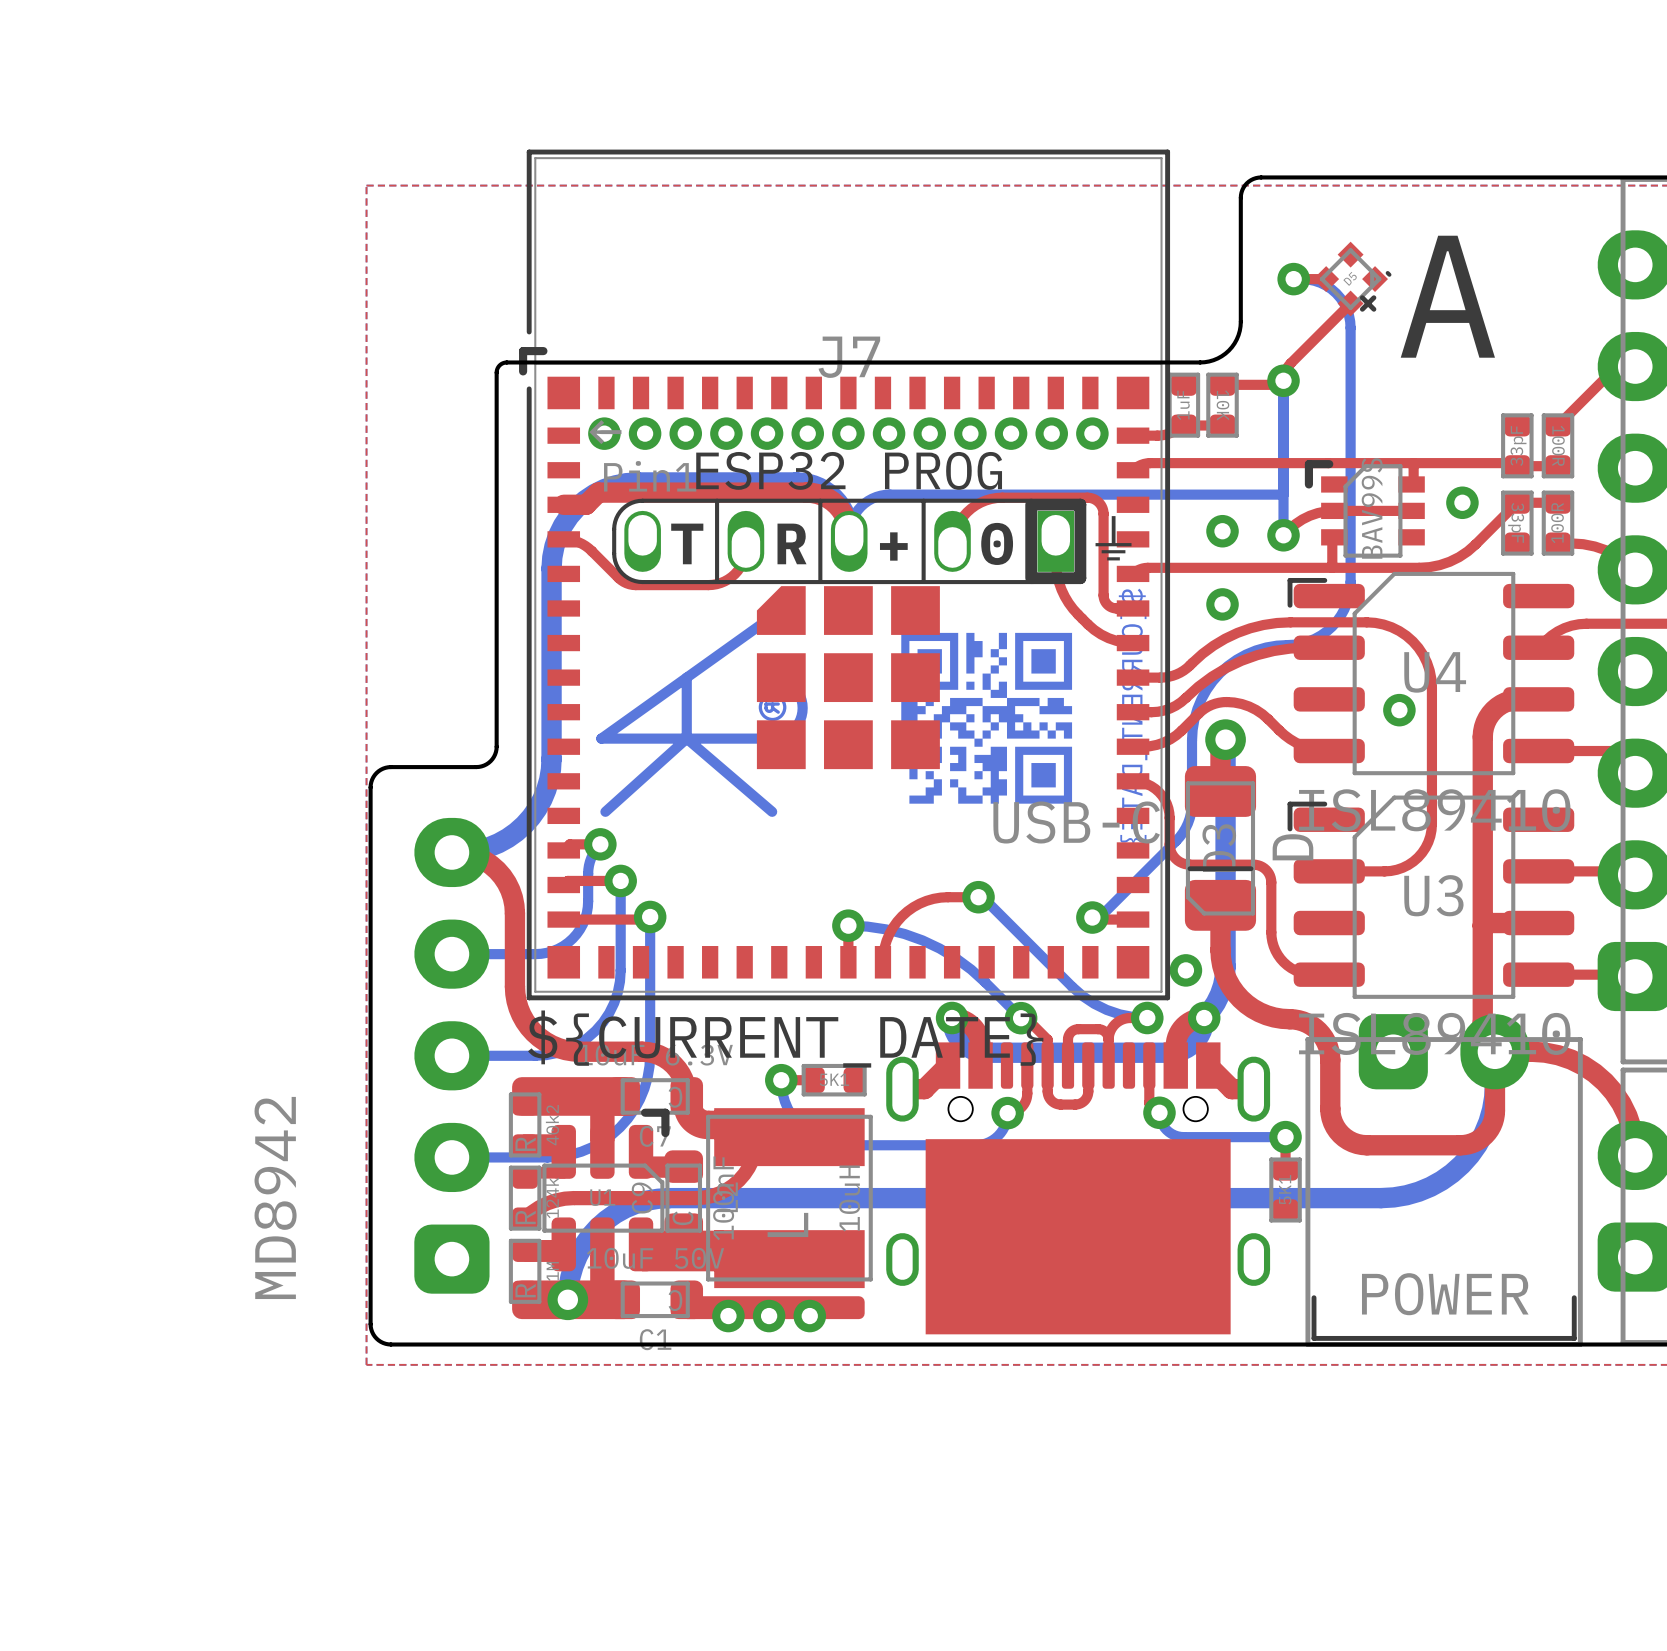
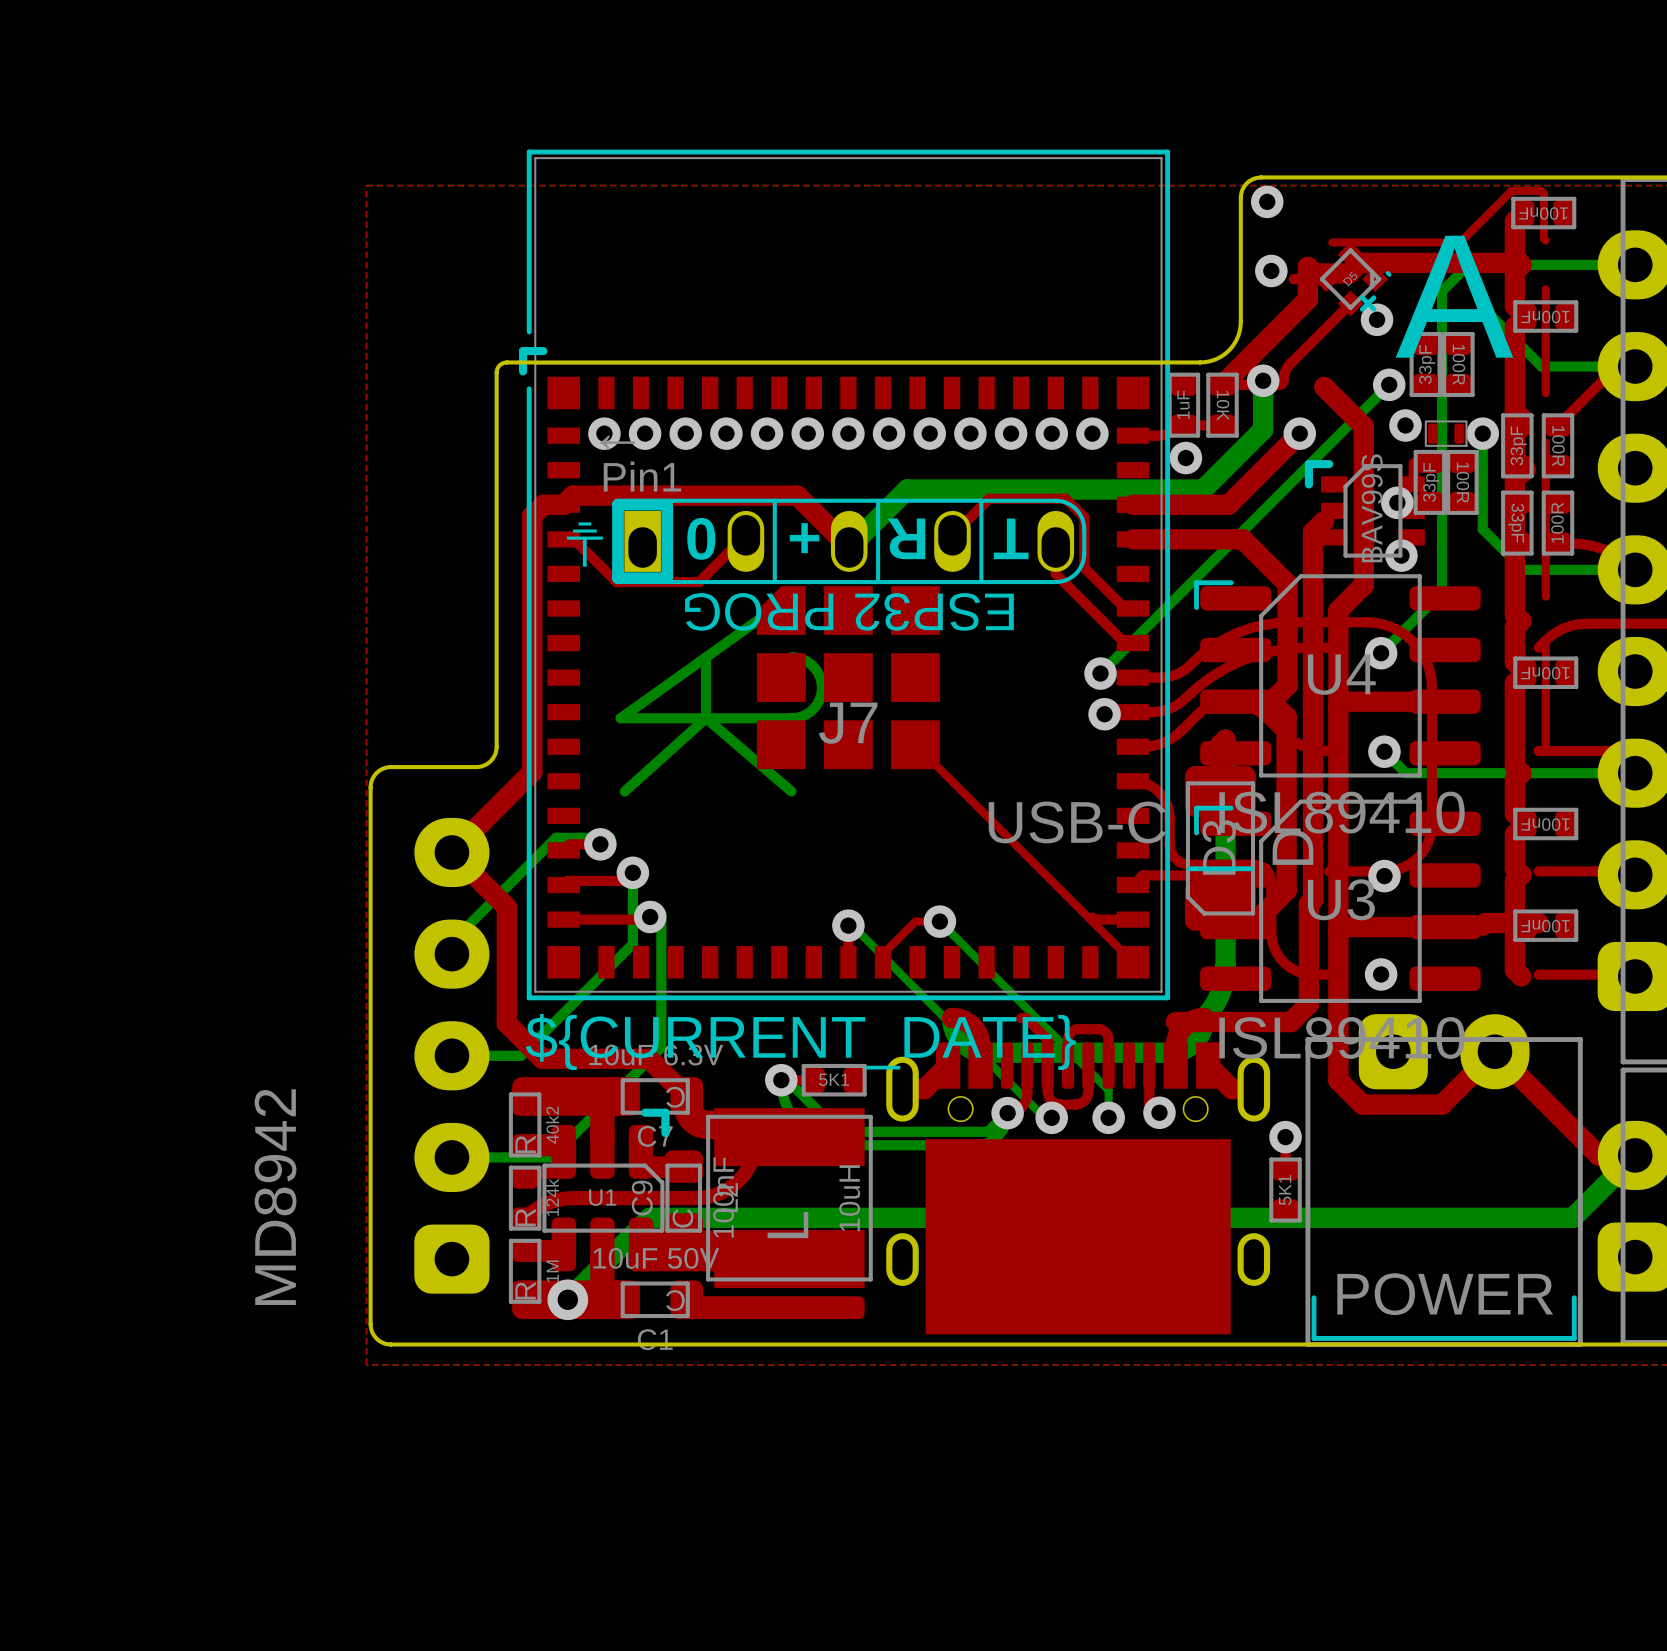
via: none -> (1267, 201)
top track: none -> (1523, 213) (1514, 221) (1514, 258) (1521, 264) (1514, 271) (1514, 305) (1525, 316) (1514, 327) (1514, 411) (1521, 417) (1514, 424) (1514, 458) (1525, 469) (1514, 480) (1514, 614) (1521, 621) (1514, 627) (1514, 662) (1525, 672) (1514, 683) (1514, 766) (1521, 773) (1514, 779) (1514, 813) (1525, 824) (1514, 834) (1514, 868) (1521, 874) (1514, 881) (1514, 915) (1525, 925) (1514, 936) (1514, 970) (1521, 976)
part: none -> 100nF (1543, 213)
top track: none -> (1545, 240) (1543, 238) (1543, 193) (1540, 190) (1511, 190) (1460, 242) (1332, 242)
top track: none -> (1519, 262) (1359, 262) (1349, 273) (1314, 273) (1307, 266) (1307, 299) (1222, 384)
bottom track: none -> (1635, 264) (1468, 264) (1442, 291) (1442, 592) (1381, 653)
bottom track: (1293, 279) (1314, 280) (1331, 289) (1344, 303) (1350, 321) (1350, 582) (1347, 602) (1336, 621) (1321, 635) (1301, 643) (1266, 647) (1246, 654) (1227, 665) (1212, 681) (1201, 699) (1194, 719) (1192, 740) (1191, 808) (1185, 828) (1176, 840) (1099, 917) (1092, 917) -> none
via position: (1293, 279) -> (1271, 270)
top track: none -> (1545, 289) (1545, 393)
bottom track: none -> (1482, 307) (1541, 366) (1635, 366)
part: none -> 100nF (1545, 316)
via: none -> (1377, 319)
part: none -> 33pF (1425, 364)
part: none -> 100R (1458, 364)
bottom track: none -> (1263, 380) (1263, 429) (1203, 489) (907, 489) (849, 547)
bottom track: (1283, 380) (1283, 535) -> none
via position: (1283, 380) -> (1263, 380)
bottom track: none -> (1389, 384) (1100, 673)
via: none -> (1389, 384)
via: none -> (1405, 425)
top track: none -> (1299, 433) (1228, 504) (1133, 504)
via: none -> (1299, 433)
part: none -> (1446, 433)
bottom track: none -> (1482, 433) (1482, 529) (1523, 569) (1635, 569)
via: none -> (1482, 433)
top track: none -> (1545, 442) (1545, 596)
via: none -> (1185, 458)
top track: (1557, 466) (1517, 466) (1514, 463) (1150, 463) (1140, 464) (1138, 466) (1135, 468) (1133, 470) (1140, 467) -> none
part: none -> 33pF (1429, 482)
part: none -> 100R (1462, 482)
bottom track: (1283, 494) (885, 494) (868, 500) (858, 509) (851, 521) (849, 535) (846, 517) (837, 502) (824, 490) (808, 483) (637, 482) (604, 488) (576, 507) (563, 525) (554, 546) (551, 568) (551, 758) (549, 779) (542, 799) (531, 817) (507, 838) (478, 850) (451, 852) -> none
via: none -> (1397, 502)
via: (1462, 502) -> none
top track: (1557, 502) (1517, 502) (1467, 551) (1449, 561) (1429, 567) (1147, 567) (1139, 569) (1133, 573) -> none
top track: (563, 504) (586, 504) (598, 492) (812, 492) (827, 498) (836, 505) (845, 518) (849, 535) -> none
top track: (1411, 510) (1326, 511) (1302, 519) (1283, 535) -> none
top track: none -> (1324, 521) (1312, 532) (1312, 900) (1308, 904) (1308, 1003) (1290, 1022) (1175, 1022)
via: (1222, 531) -> none
via: (1283, 535) -> none
top track: (1334, 537) (1332, 541) (1332, 567) -> none
top track: (563, 539) (575, 541) (585, 545) (621, 580) (635, 585) (708, 585) (720, 583) (737, 570) (743, 559) (745, 547) -> (563, 539) (573, 539) (616, 582) (699, 582) (745, 535)
top track: none -> (1133, 539) (1242, 539) (1287, 584) (1287, 685) (1271, 701)
J7 rotation: 0° (849, 541) -> 180° (849, 541)
top track: (952, 547) (953, 536) (960, 520) (971, 508) (985, 500) (1002, 497) (1092, 498) (1100, 503) (1103, 512) (1104, 599) (1111, 607) (1124, 608) -> (952, 535) (989, 498) (1065, 498) (1084, 517) (1084, 567) (1124, 608)
via: none -> (1401, 555)
top track: (1055, 560) (1061, 589) (1078, 614) (1101, 634) (1116, 640) (1133, 643) -> (1055, 560) (1055, 573) (1124, 643) (1133, 643)
via: (1222, 604) -> none
top track: none -> (1545, 645) (1545, 748)
via: none -> (1381, 653)
part: none -> 100nF (1545, 672)
via: none -> (1100, 673)
U4 position: (1430, 673) -> (1337, 675)
top track: (1538, 699) (1515, 699) (1501, 704) (1490, 714) (1483, 731) (1482, 1022) (1485, 1038) (1494, 1051) -> none
top track: none -> (1271, 701) (1286, 716) (1286, 890) (1250, 927) (1235, 927)
top track: none -> (1445, 701) (1344, 701) (1338, 708)
via: (1399, 710) -> none
drawing position: (702, 714) -> (721, 693)
via: none -> (1104, 714)
part: (986, 718) -> none
via: (1225, 739) -> none
top track: none -> (915, 744) (1133, 962)
bottom track: none -> (1384, 751) (1405, 773) (1635, 773)
via: none -> (1384, 751)
part: none -> 100nF (1545, 824)
bottom track: (600, 844) (593, 854) (588, 865) (587, 907) (585, 918) (576, 934) (568, 942) (558, 948) (541, 953) (451, 954) -> (610, 837) (556, 837) (451, 941) (451, 954)
top track: (451, 852) (469, 854) (484, 860) (497, 870) (510, 890) (514, 913) (515, 993) (521, 1014) (534, 1032) (545, 1041) (565, 1050) (642, 1051) (659, 1055) (669, 1060) (677, 1069) (683, 1079) (686, 1096) -> (849, 547) (797, 495) (572, 495) (563, 504) (543, 504) (532, 515) (532, 772) (451, 852) (506, 907) (506, 1023) (542, 1058) (649, 1058) (686, 1096)
top track: none -> (1235, 875) (1142, 875) (1133, 885)
via: none -> (1384, 876)
bottom track: (620, 880) (619, 981) (609, 1013) (595, 1030) (567, 1049) (546, 1055) (521, 1055) -> (632, 872) (632, 943) (521, 1055)
via position: (620, 880) -> (632, 872)
top track: (978, 897) (940, 897) (926, 900) (913, 907) (902, 916) (892, 927) (886, 940) (882, 962) -> (939, 921) (915, 921) (882, 954) (882, 962)
bottom track: (978, 897) (985, 900) (1082, 996) (1094, 1003) (1119, 1014) (1147, 1018) -> none
via position: (978, 897) -> (939, 921)
U3 position: (1430, 897) -> (1337, 901)
top track: (1220, 905) (1220, 957) (1227, 980) (1240, 998) (1252, 1008) (1274, 1017) (1303, 1021) (1314, 1028) (1321, 1034) (1327, 1046) (1330, 1055) (1331, 1118) (1337, 1130) (1348, 1140) (1366, 1145) (1460, 1145) (1478, 1139) (1489, 1129) (1494, 1118) (1494, 1051) -> none
bottom track: (650, 916) (650, 1054) (647, 1077) (640, 1099) (620, 1127) (602, 1141) (570, 1154) (547, 1157) -> (661, 913) (661, 1047) (551, 1157) (547, 1157)
via: (1092, 917) -> none
bottom track: none -> (848, 921) (1044, 1117) (1051, 1117)
bottom track: none -> (939, 921) (1108, 1090) (1108, 1117)
bottom track: (848, 925) (886, 929) (922, 940) (939, 948) (971, 969) (1021, 1018) -> none
part: none -> 100nF (1545, 925)
top track: none -> (1445, 927) (1343, 927) (1338, 931)
via: (1185, 970) -> none
via: none -> (1381, 974)
via: (952, 1018) -> none
via: (1021, 1018) -> none
top track: (1147, 1018) (1127, 1018) (1119, 1020) (1111, 1028) (1108, 1039) -> none
via: (1147, 1018) -> none
via: (1204, 1018) -> none
top track: (1494, 1051) (1531, 1051) (1558, 1055) (1583, 1065) (1594, 1073) (1613, 1092) (1627, 1115) (1634, 1141) (1635, 1155) -> (1324, 386) (1363, 426) (1363, 585) (1338, 610) (1338, 1080) (1362, 1104) (1442, 1104) (1494, 1051) (1598, 1155) (1635, 1155)
bottom track: (1494, 1051) (1494, 1084) (1492, 1109) (1477, 1144) (1461, 1164) (1441, 1180) (1406, 1195) (1381, 1198) (658, 1198) (625, 1208) (597, 1227) (577, 1255) (570, 1277) (567, 1299) -> (1635, 1155) (1572, 1217) (649, 1217) (567, 1299)
bottom track: none -> (787, 1080) (839, 1131) (987, 1131) (1005, 1114)
bottom track: (1159, 1112) (1164, 1127) (1171, 1133) (1180, 1136) (1285, 1137) -> none
via: none -> (1051, 1117)
via: none -> (1108, 1117)
via: (728, 1316) -> none
via: (769, 1316) -> none
via: (809, 1316) -> none

